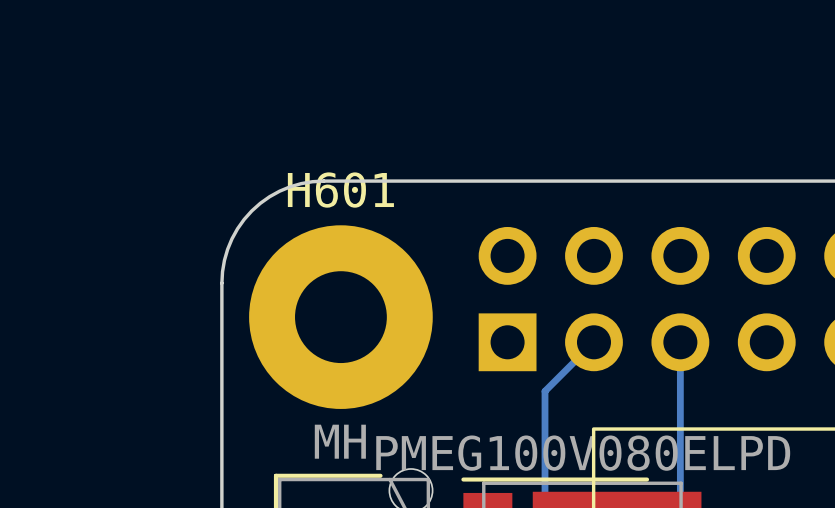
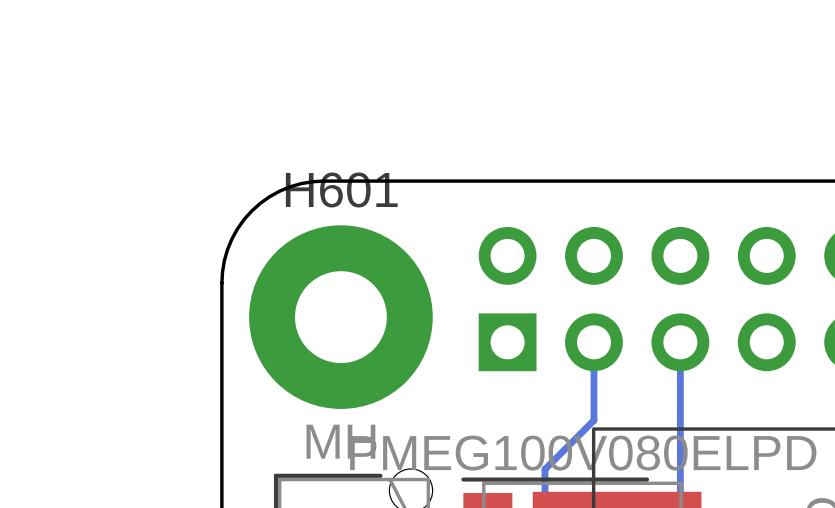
bottom track: (593, 342) (545, 391) (545, 469) -> (593, 342) (593, 420) (545, 469)

